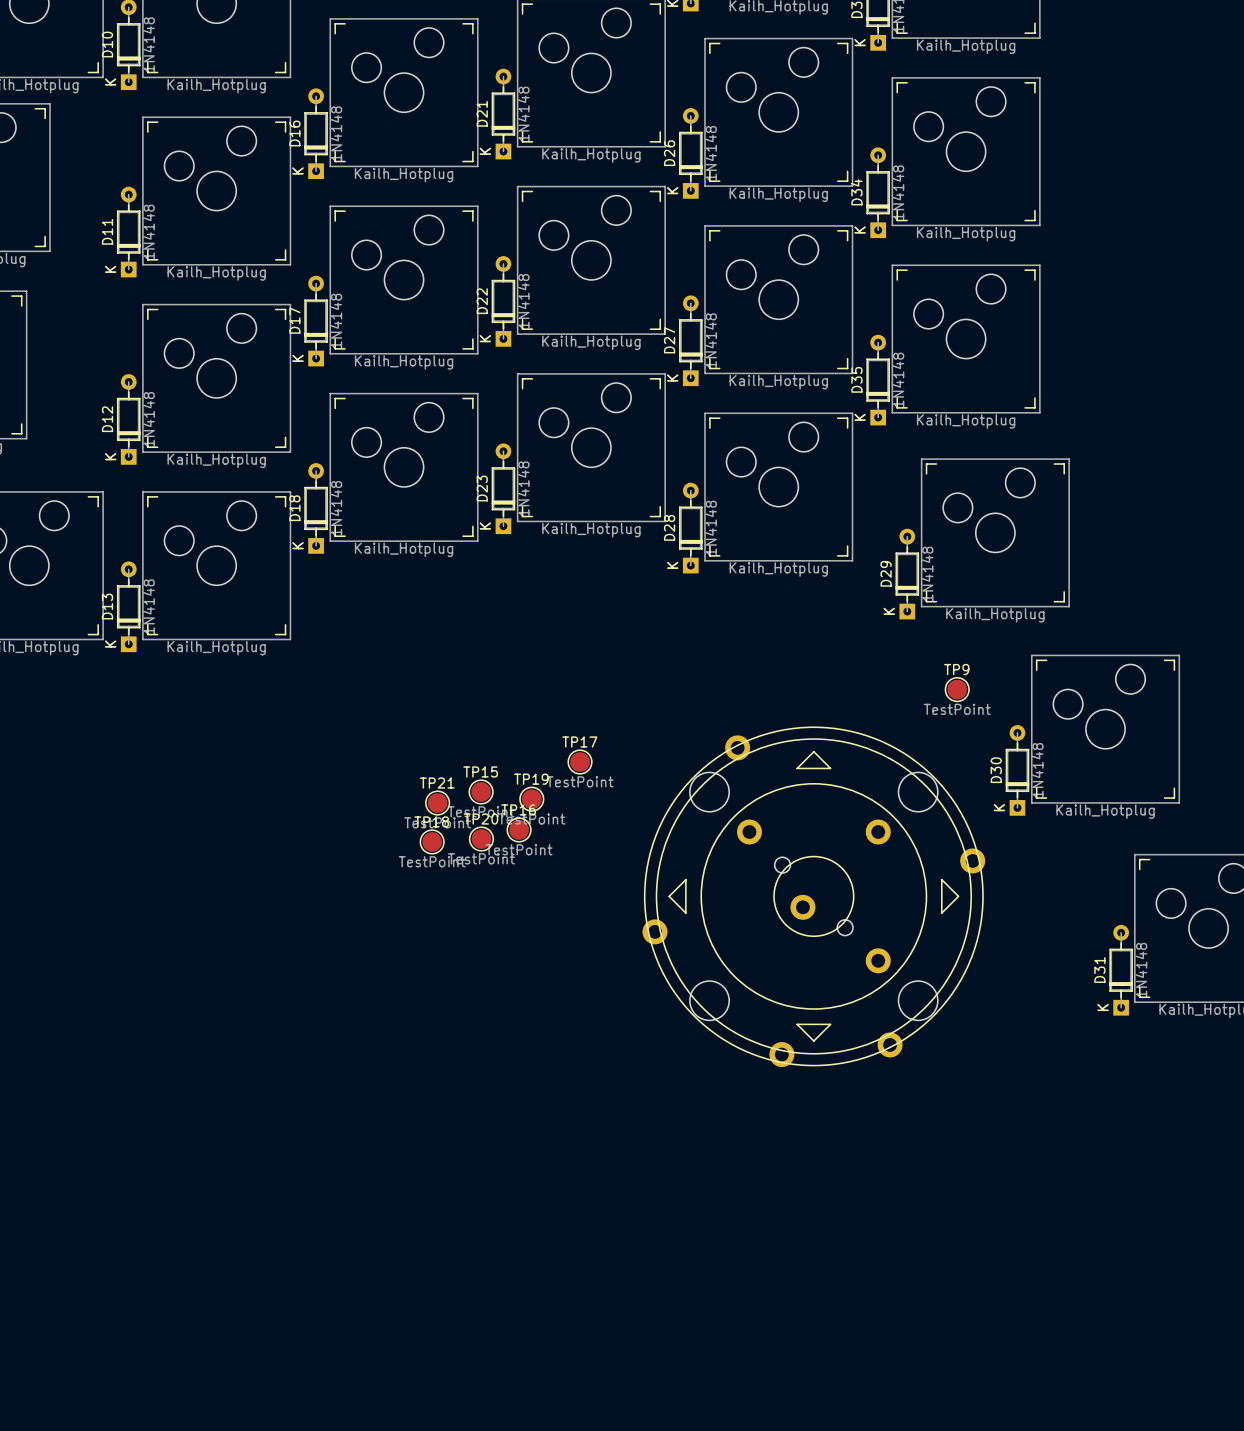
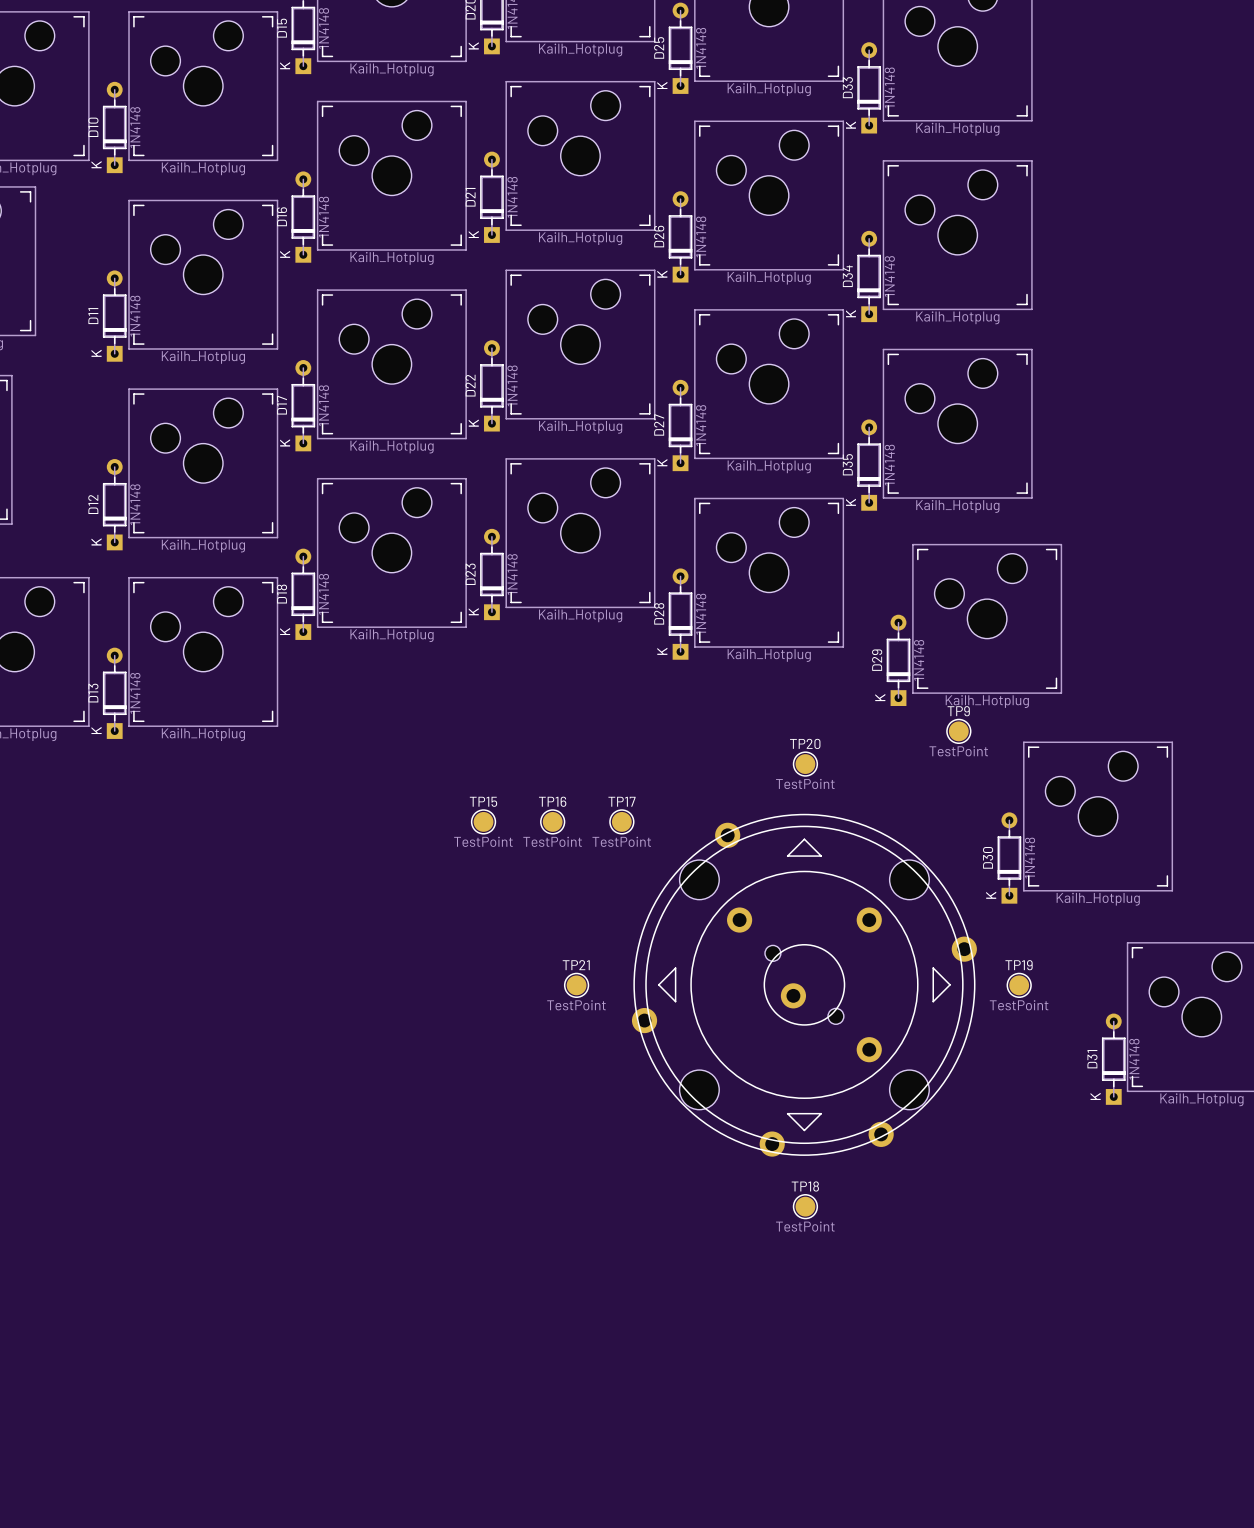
TP9 position: (957, 689) -> (958, 731)
TP17 position: (580, 762) -> (621, 821)
TP15 position: (481, 791) -> (483, 821)
TP19 position: (531, 799) -> (1019, 985)
TP21 position: (437, 803) -> (576, 985)
TP16 position: (519, 829) -> (552, 821)
TP20 position: (481, 839) -> (805, 764)
TP18 position: (432, 841) -> (805, 1206)

